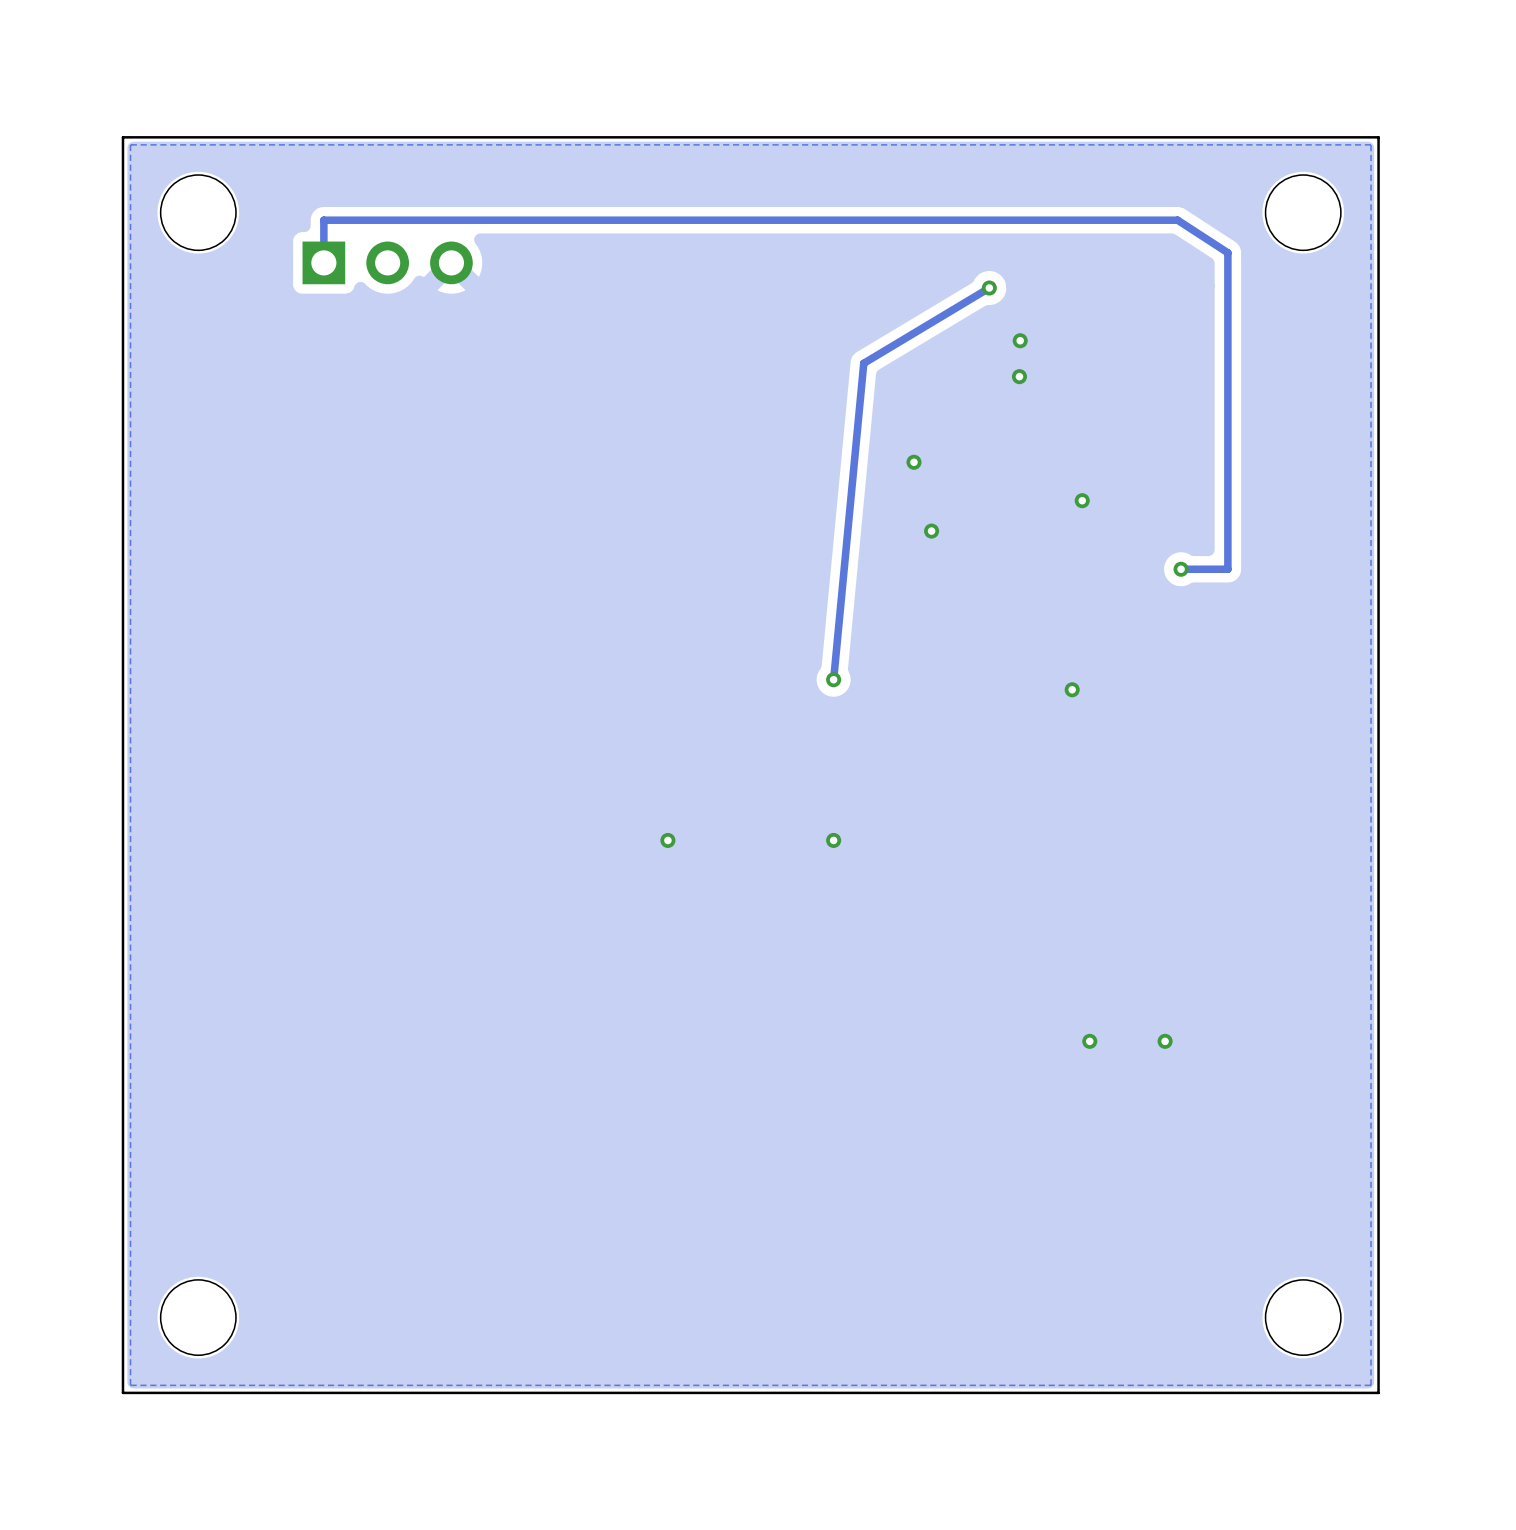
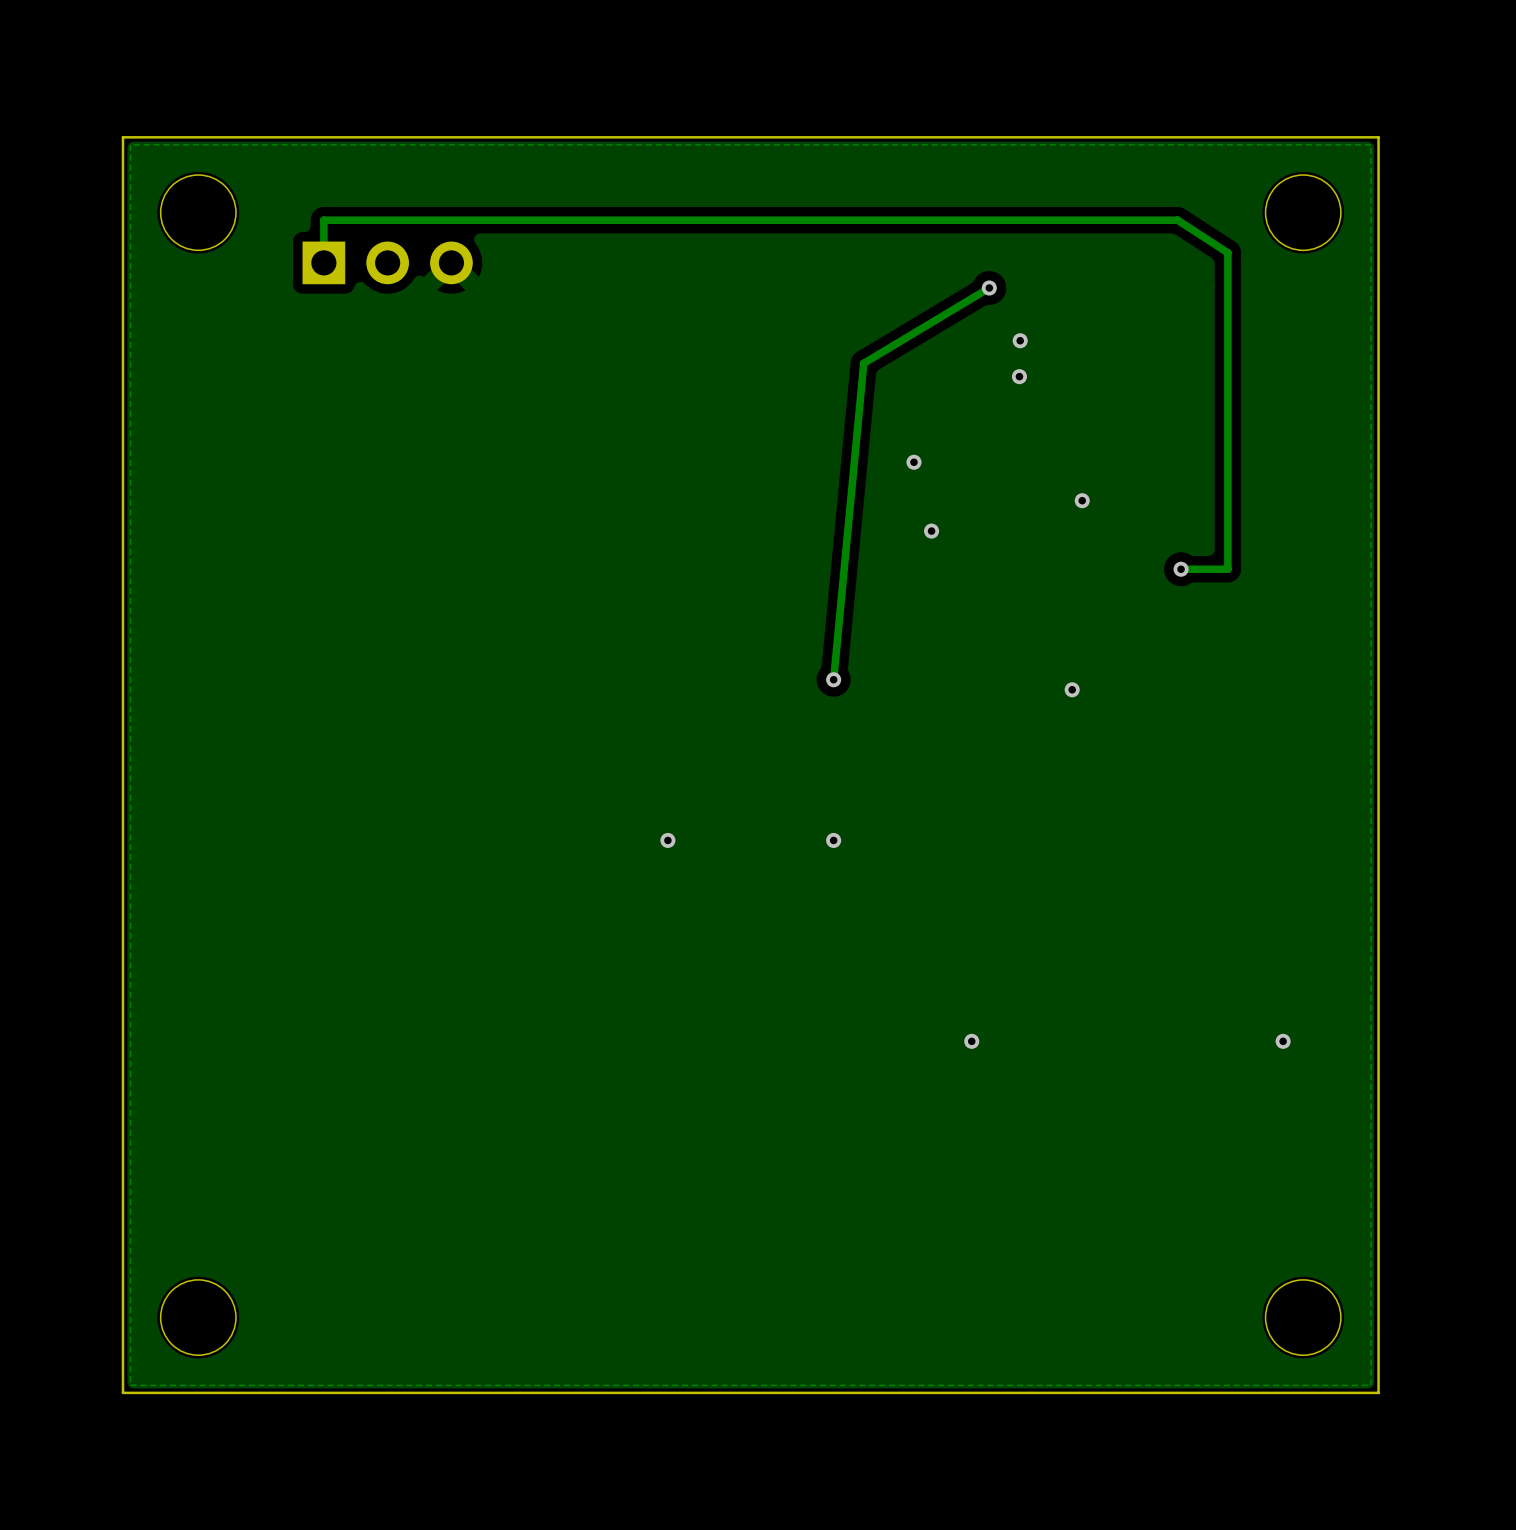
via: none -> (971, 1041)
via: (1089, 1041) -> none
via: (1165, 1041) -> none
via: none -> (1283, 1041)

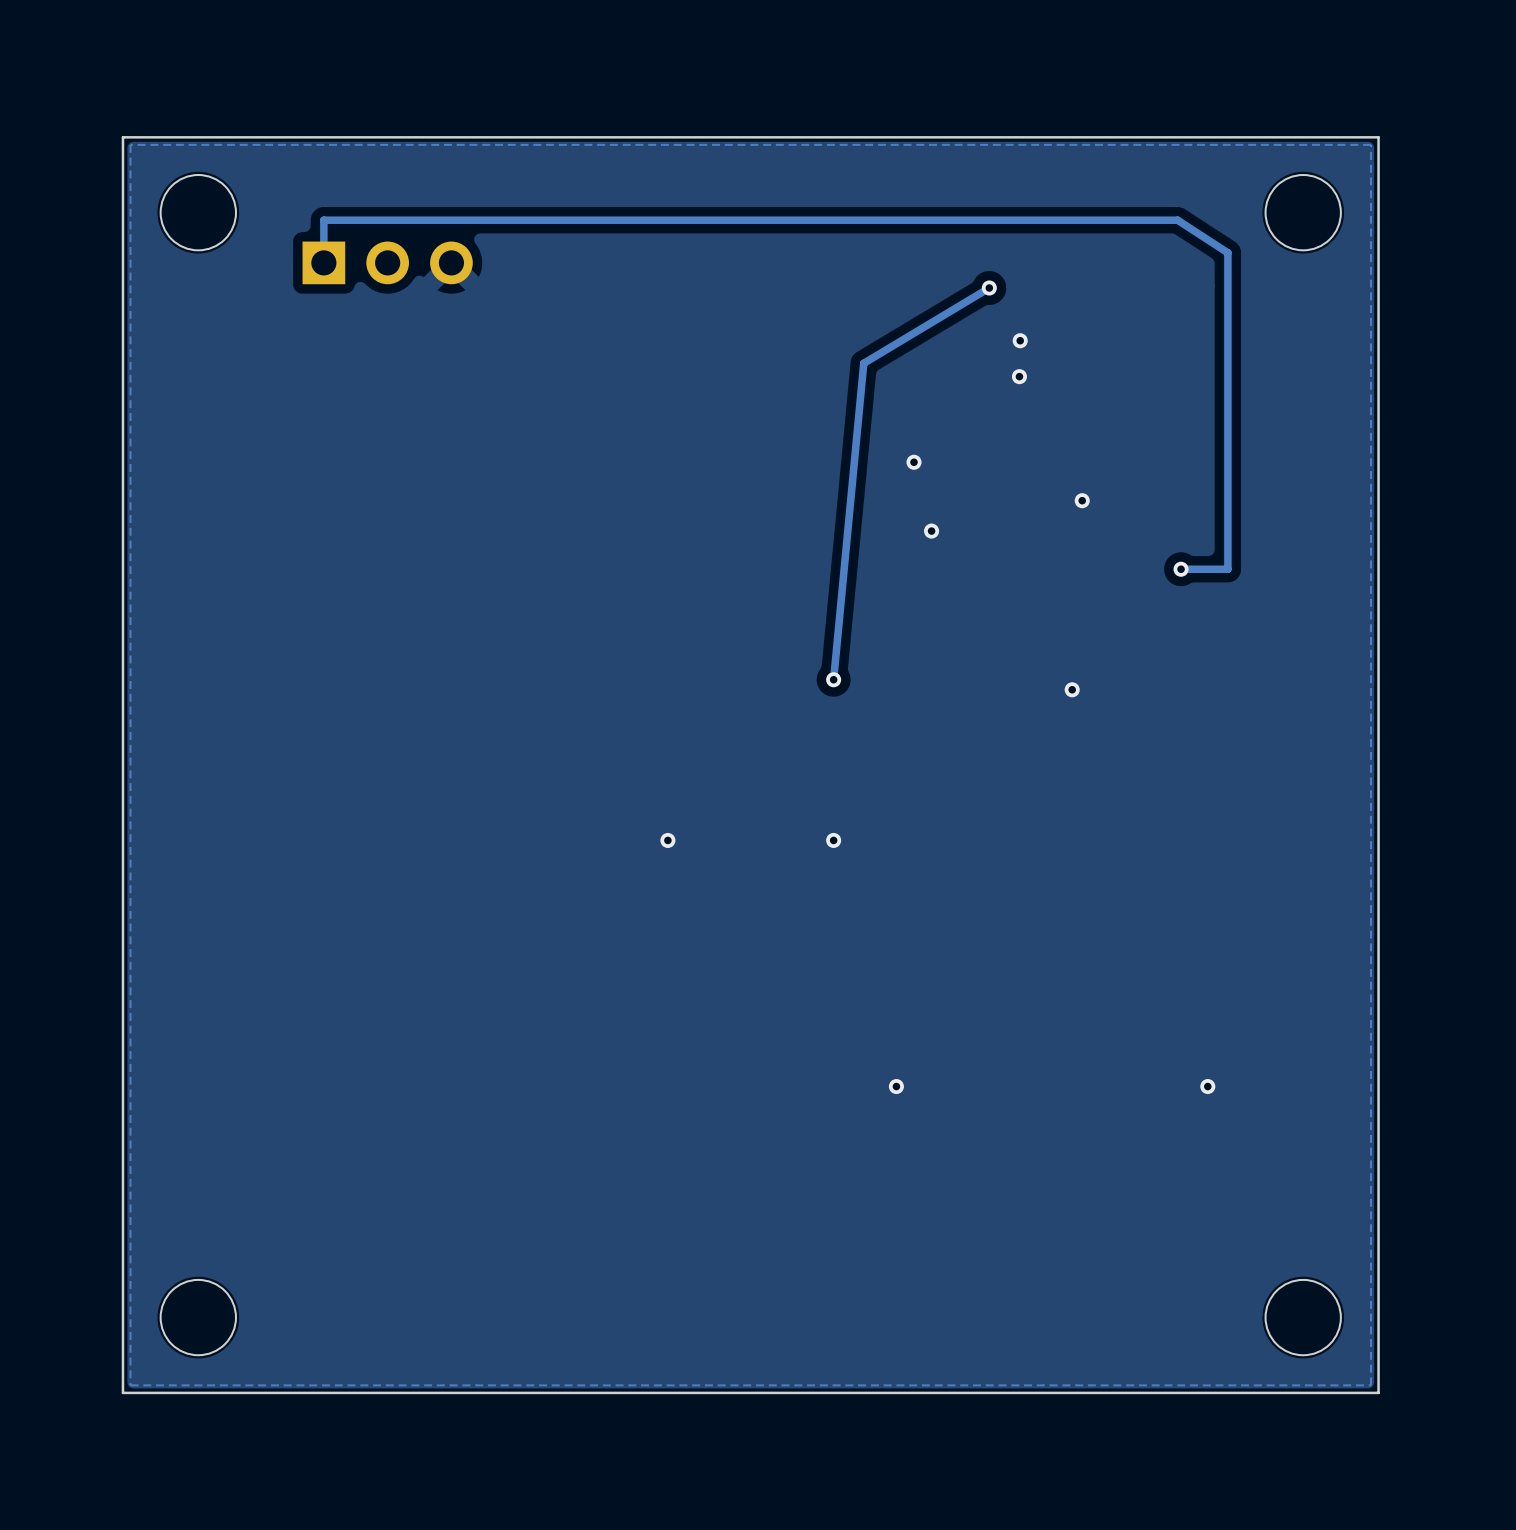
via position: (971, 1041) -> (896, 1086)
via position: (1283, 1041) -> (1207, 1086)

